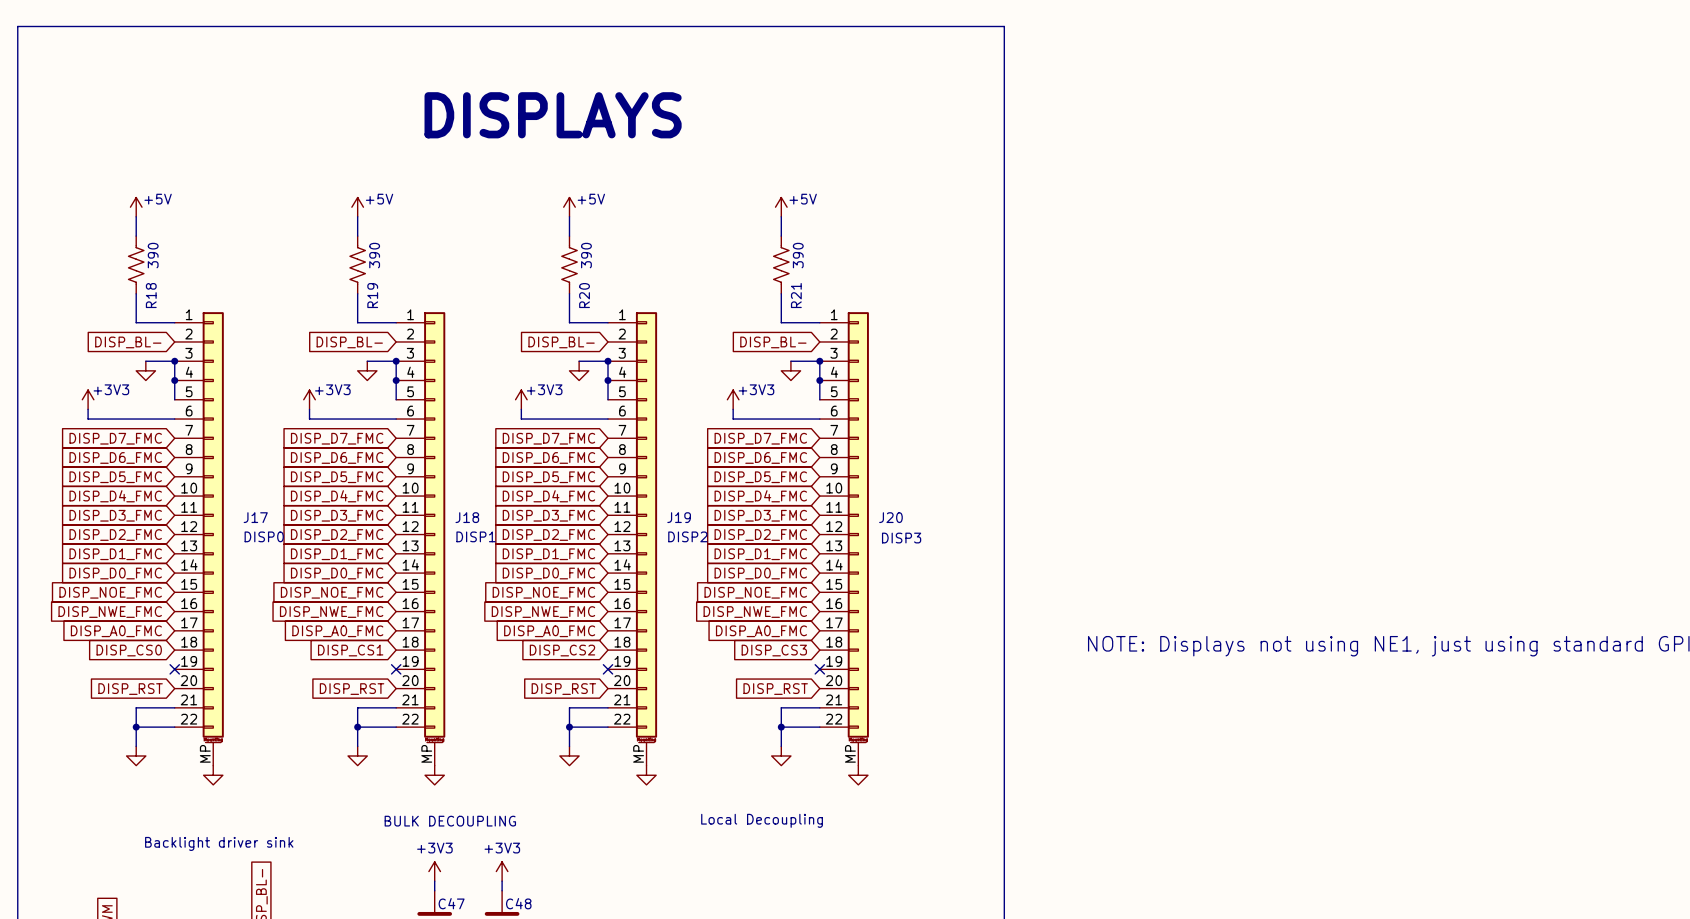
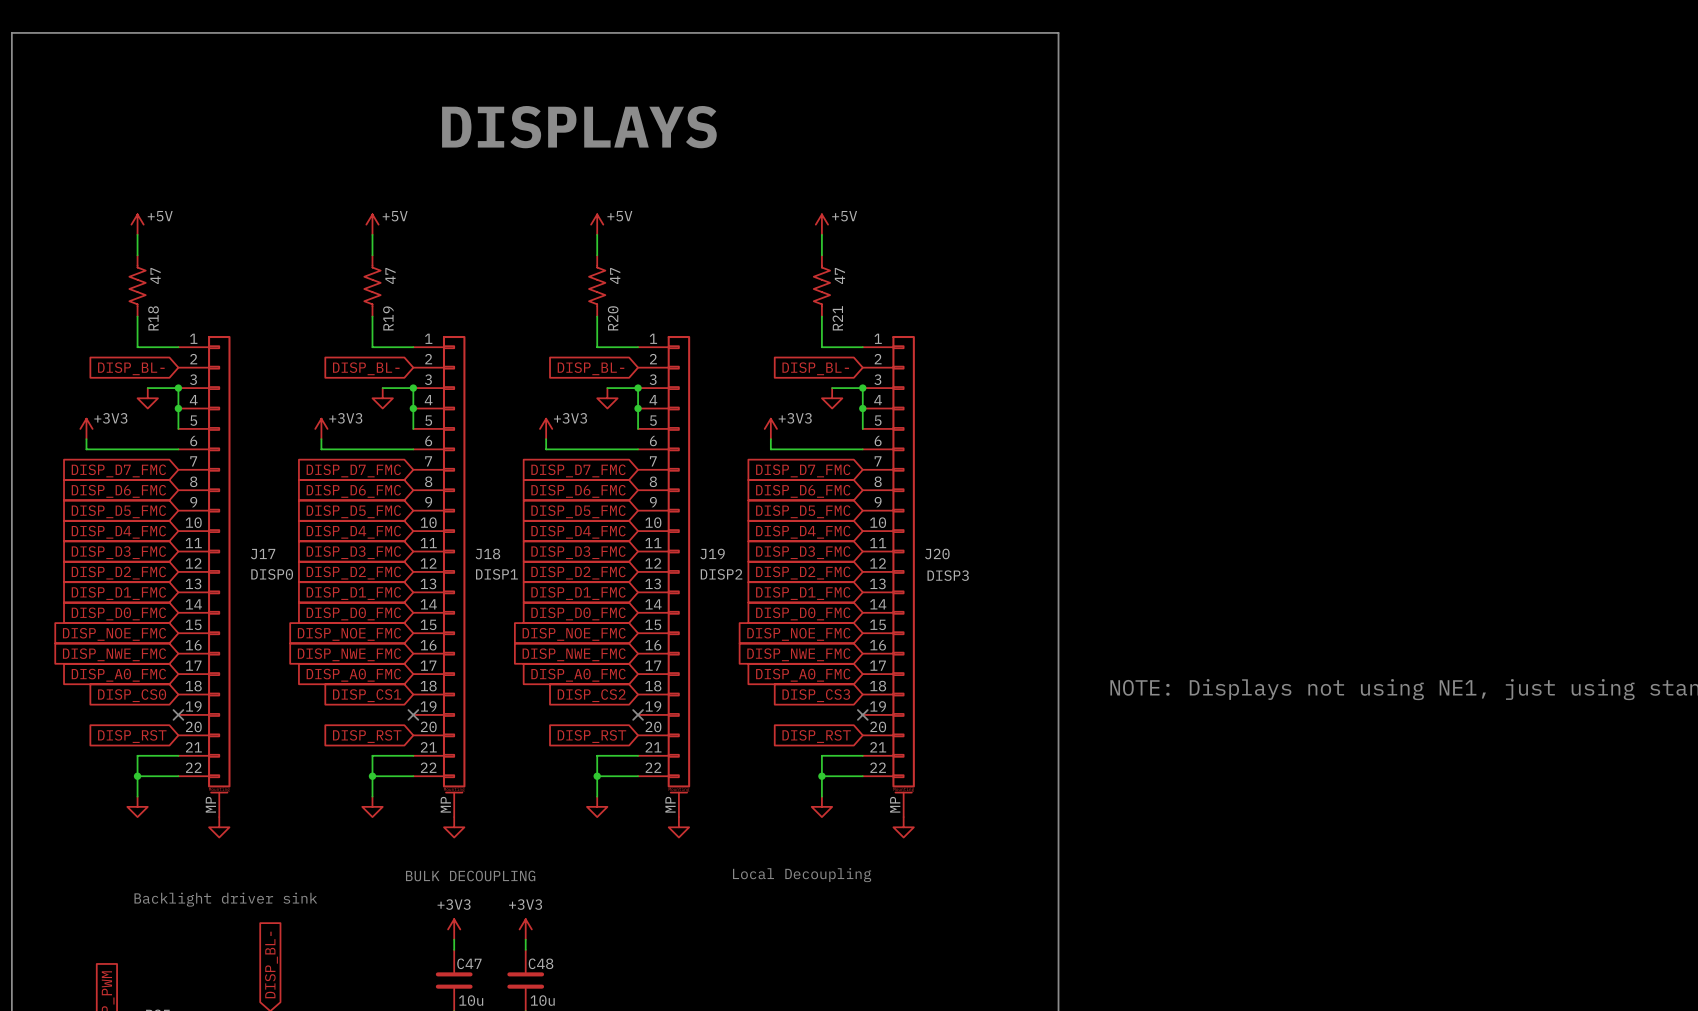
R18 value: 390 (153, 255) -> 47 (155, 275)
R19 value: 390 (374, 255) -> 47 (390, 275)
R20 value: 390 (586, 255) -> 47 (615, 275)
R21 value: 390 (798, 255) -> 47 (839, 275)

